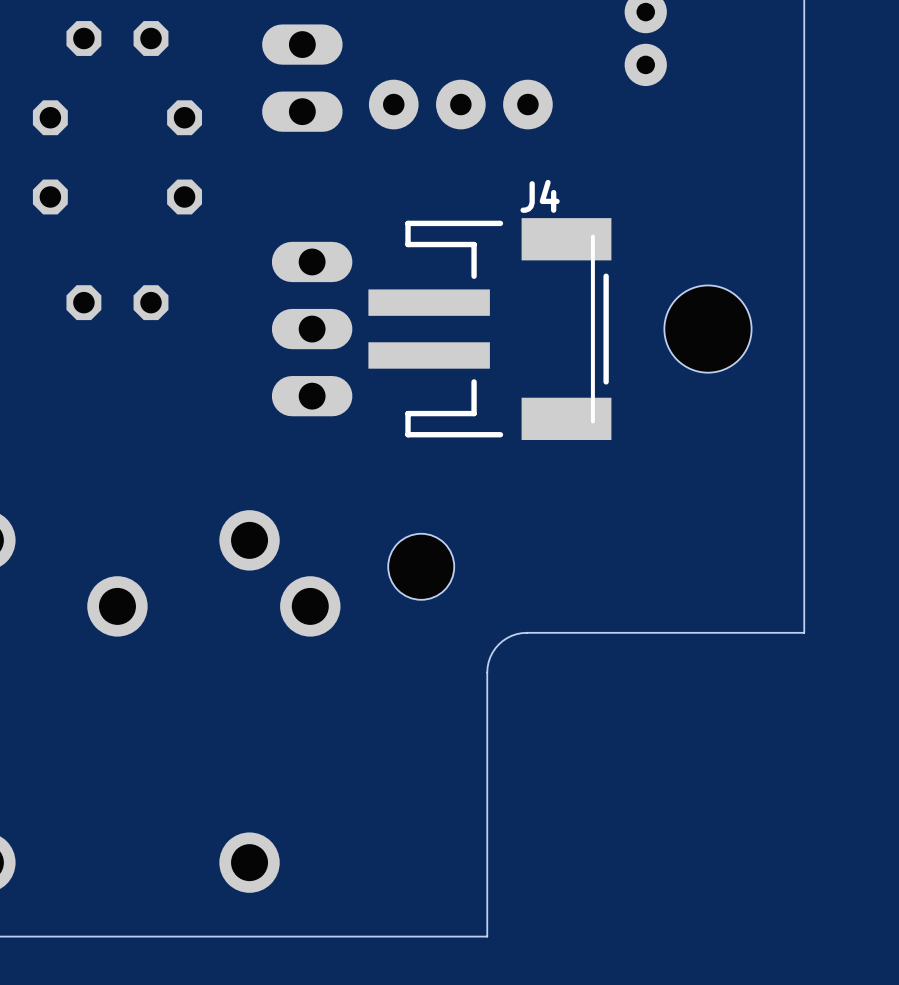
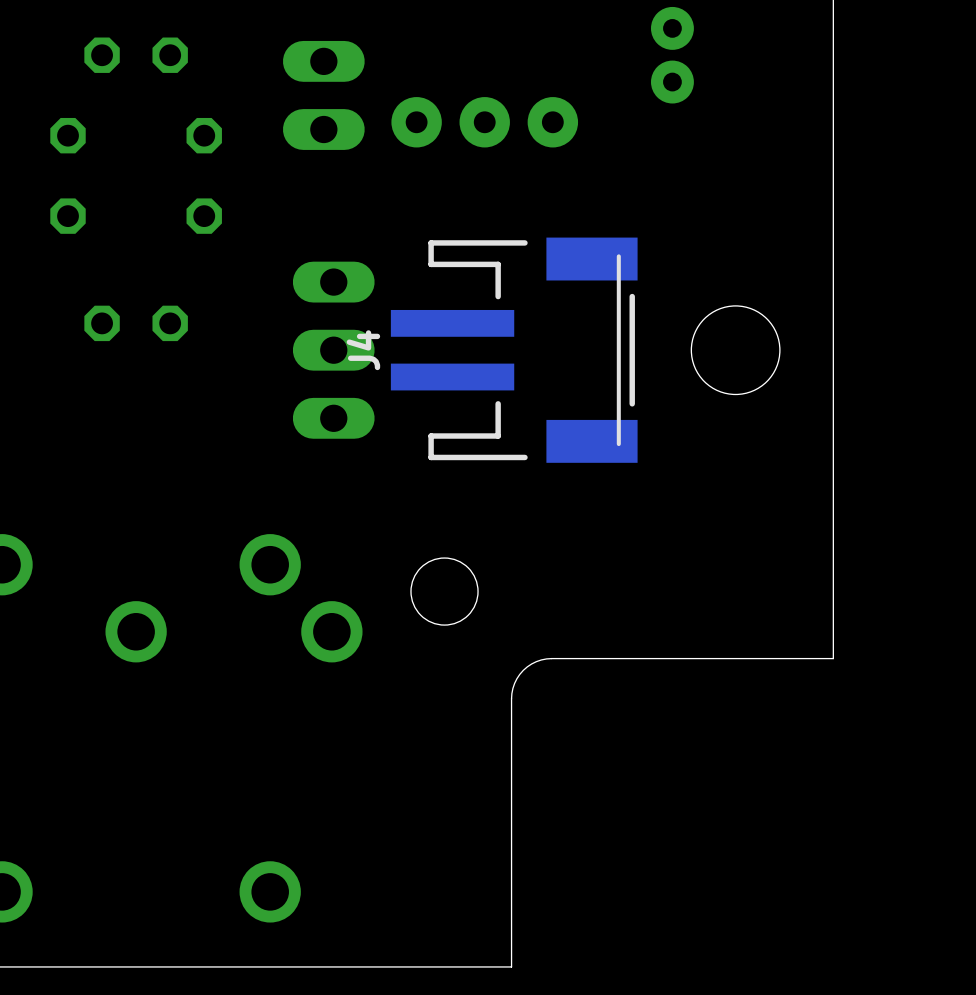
J4 name rotation: 0° (540, 196) -> 90° counterclockwise (363, 350)
J4 name position: J4 (540, 196) -> J4 (363, 350)

